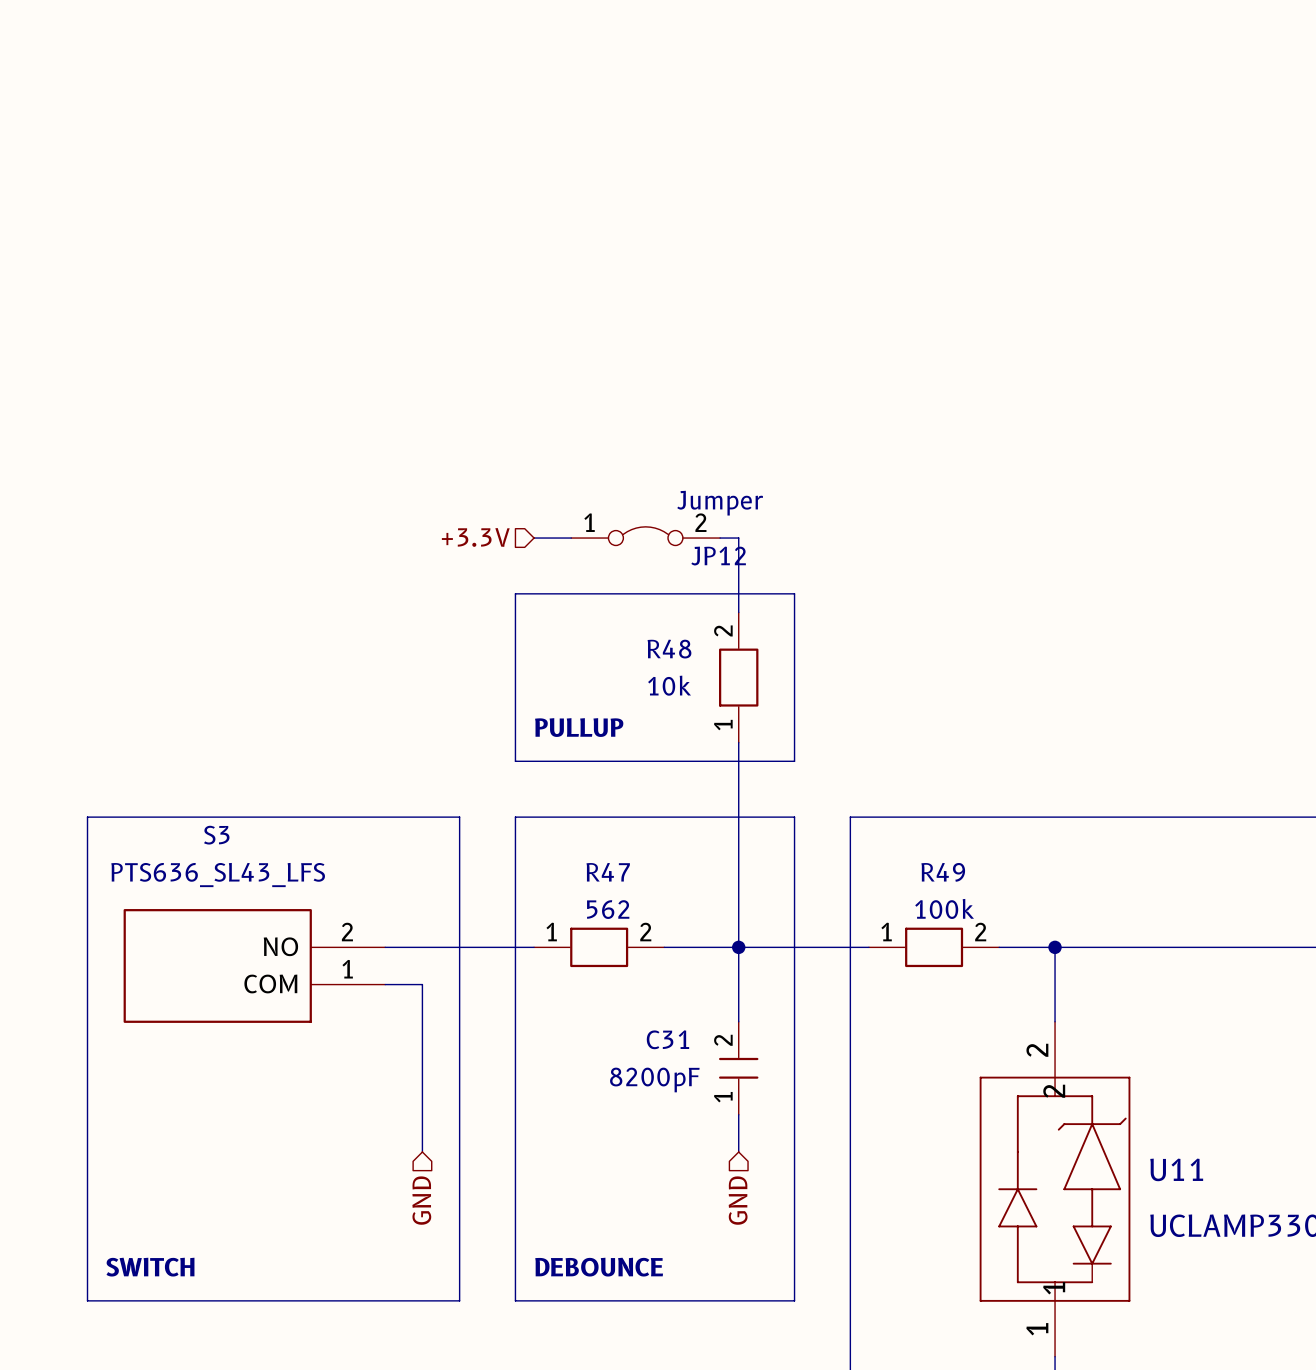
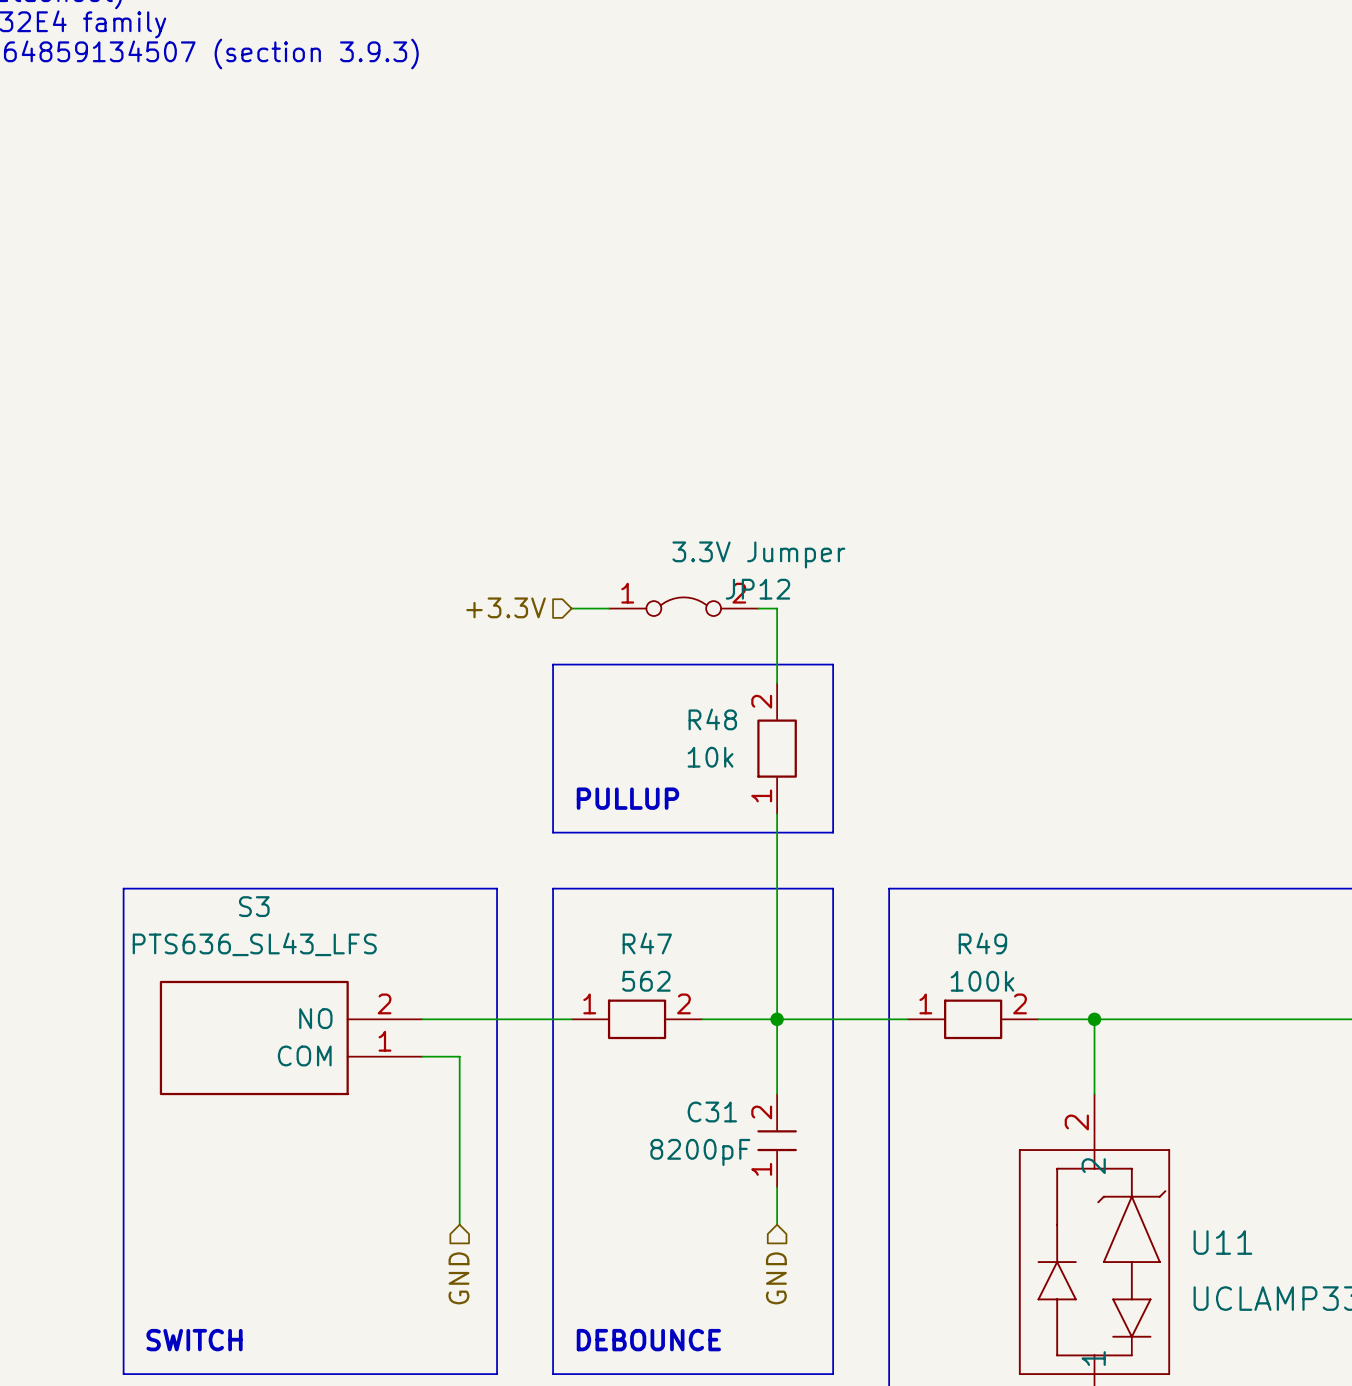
JP12 value: Jumper (720, 503) -> 3.3V Jumper (758, 554)
JP12 name position: JP12 (718, 556) -> JP12 (757, 589)

